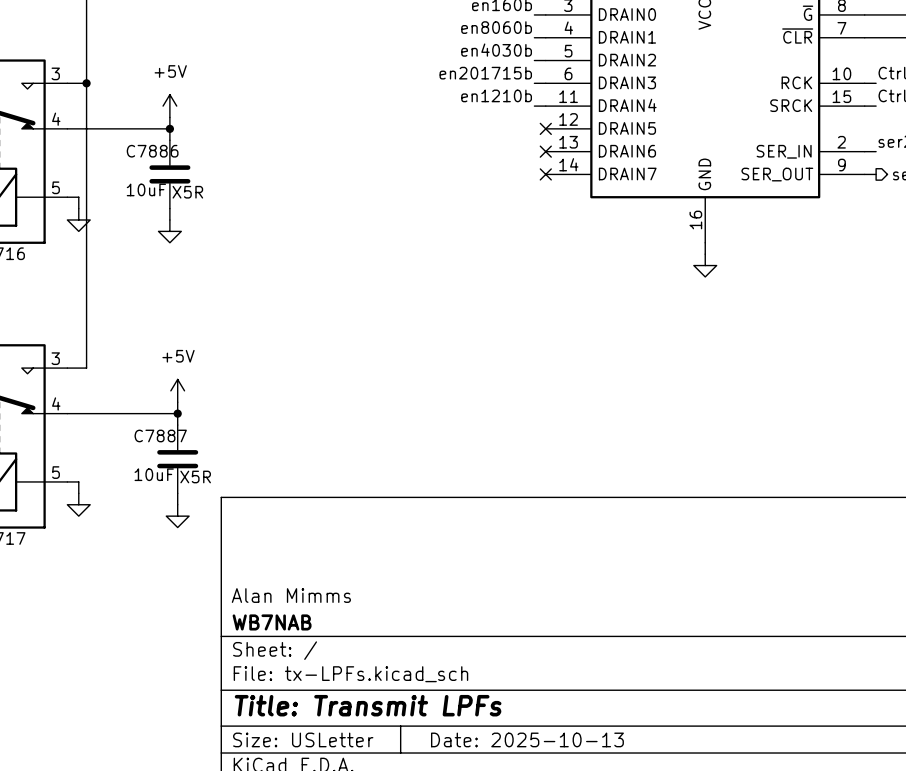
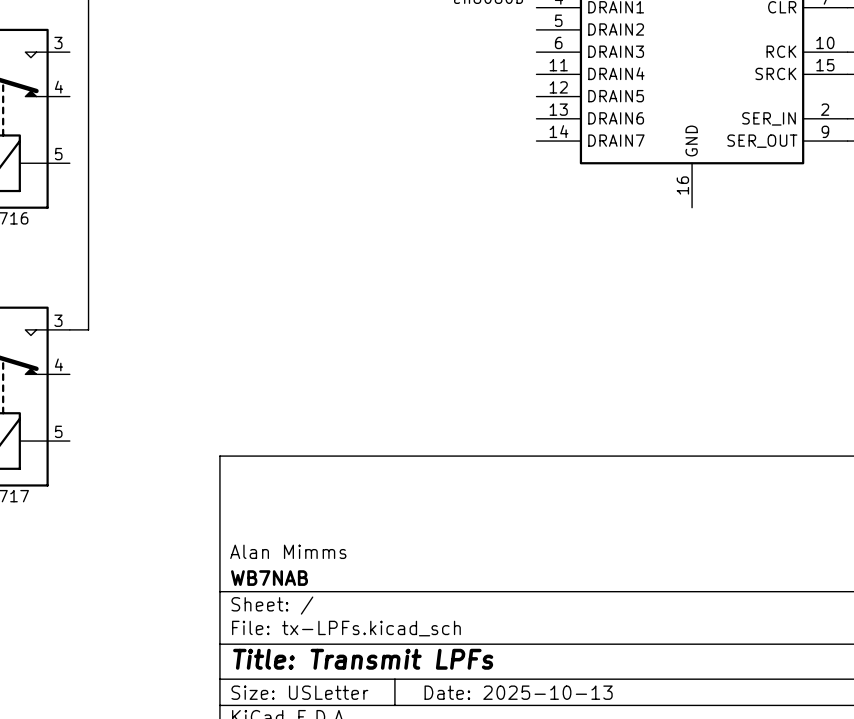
wire: (534, 37) (545, 37) -> none
label: en4030b (496, 50) -> none
wire: (534, 60) (545, 60) -> none
label: en201715b (485, 73) -> none
wire: (67, 83) (86, 83) -> none
junction: (86, 83) -> none
wire: (534, 83) (545, 83) -> none
label: en1210b (496, 95) -> none
power symbol: +5V (169, 106) -> none
wire: (534, 106) (545, 106) -> none
wire: (169, 117) (169, 140) -> none
wire: (67, 128) (169, 128) -> none
junction: (169, 128) -> none
no-connect mark: (545, 128) -> none
no-connect mark: (545, 151) -> none
C7886: 10uF (169, 174) -> none
no-connect mark: (545, 174) -> none
wire: (67, 197) (78, 197) (78, 208) -> none
wire: (169, 208) (169, 219) -> none
power symbol: (78, 219) -> none
power symbol: (169, 231) -> none
wire: (705, 242) (705, 254) -> none
power symbol: (705, 265) -> none
power symbol: +5V (177, 390) -> none
wire: (177, 402) (177, 425) -> none
wire: (67, 413) (177, 413) -> none
junction: (177, 413) -> none
C7887: 10uF (177, 459) -> none
wire: (67, 481) (78, 481) (78, 493) -> none
wire: (177, 493) (177, 504) -> none
power symbol: (78, 504) -> none
power symbol: (177, 516) -> none

